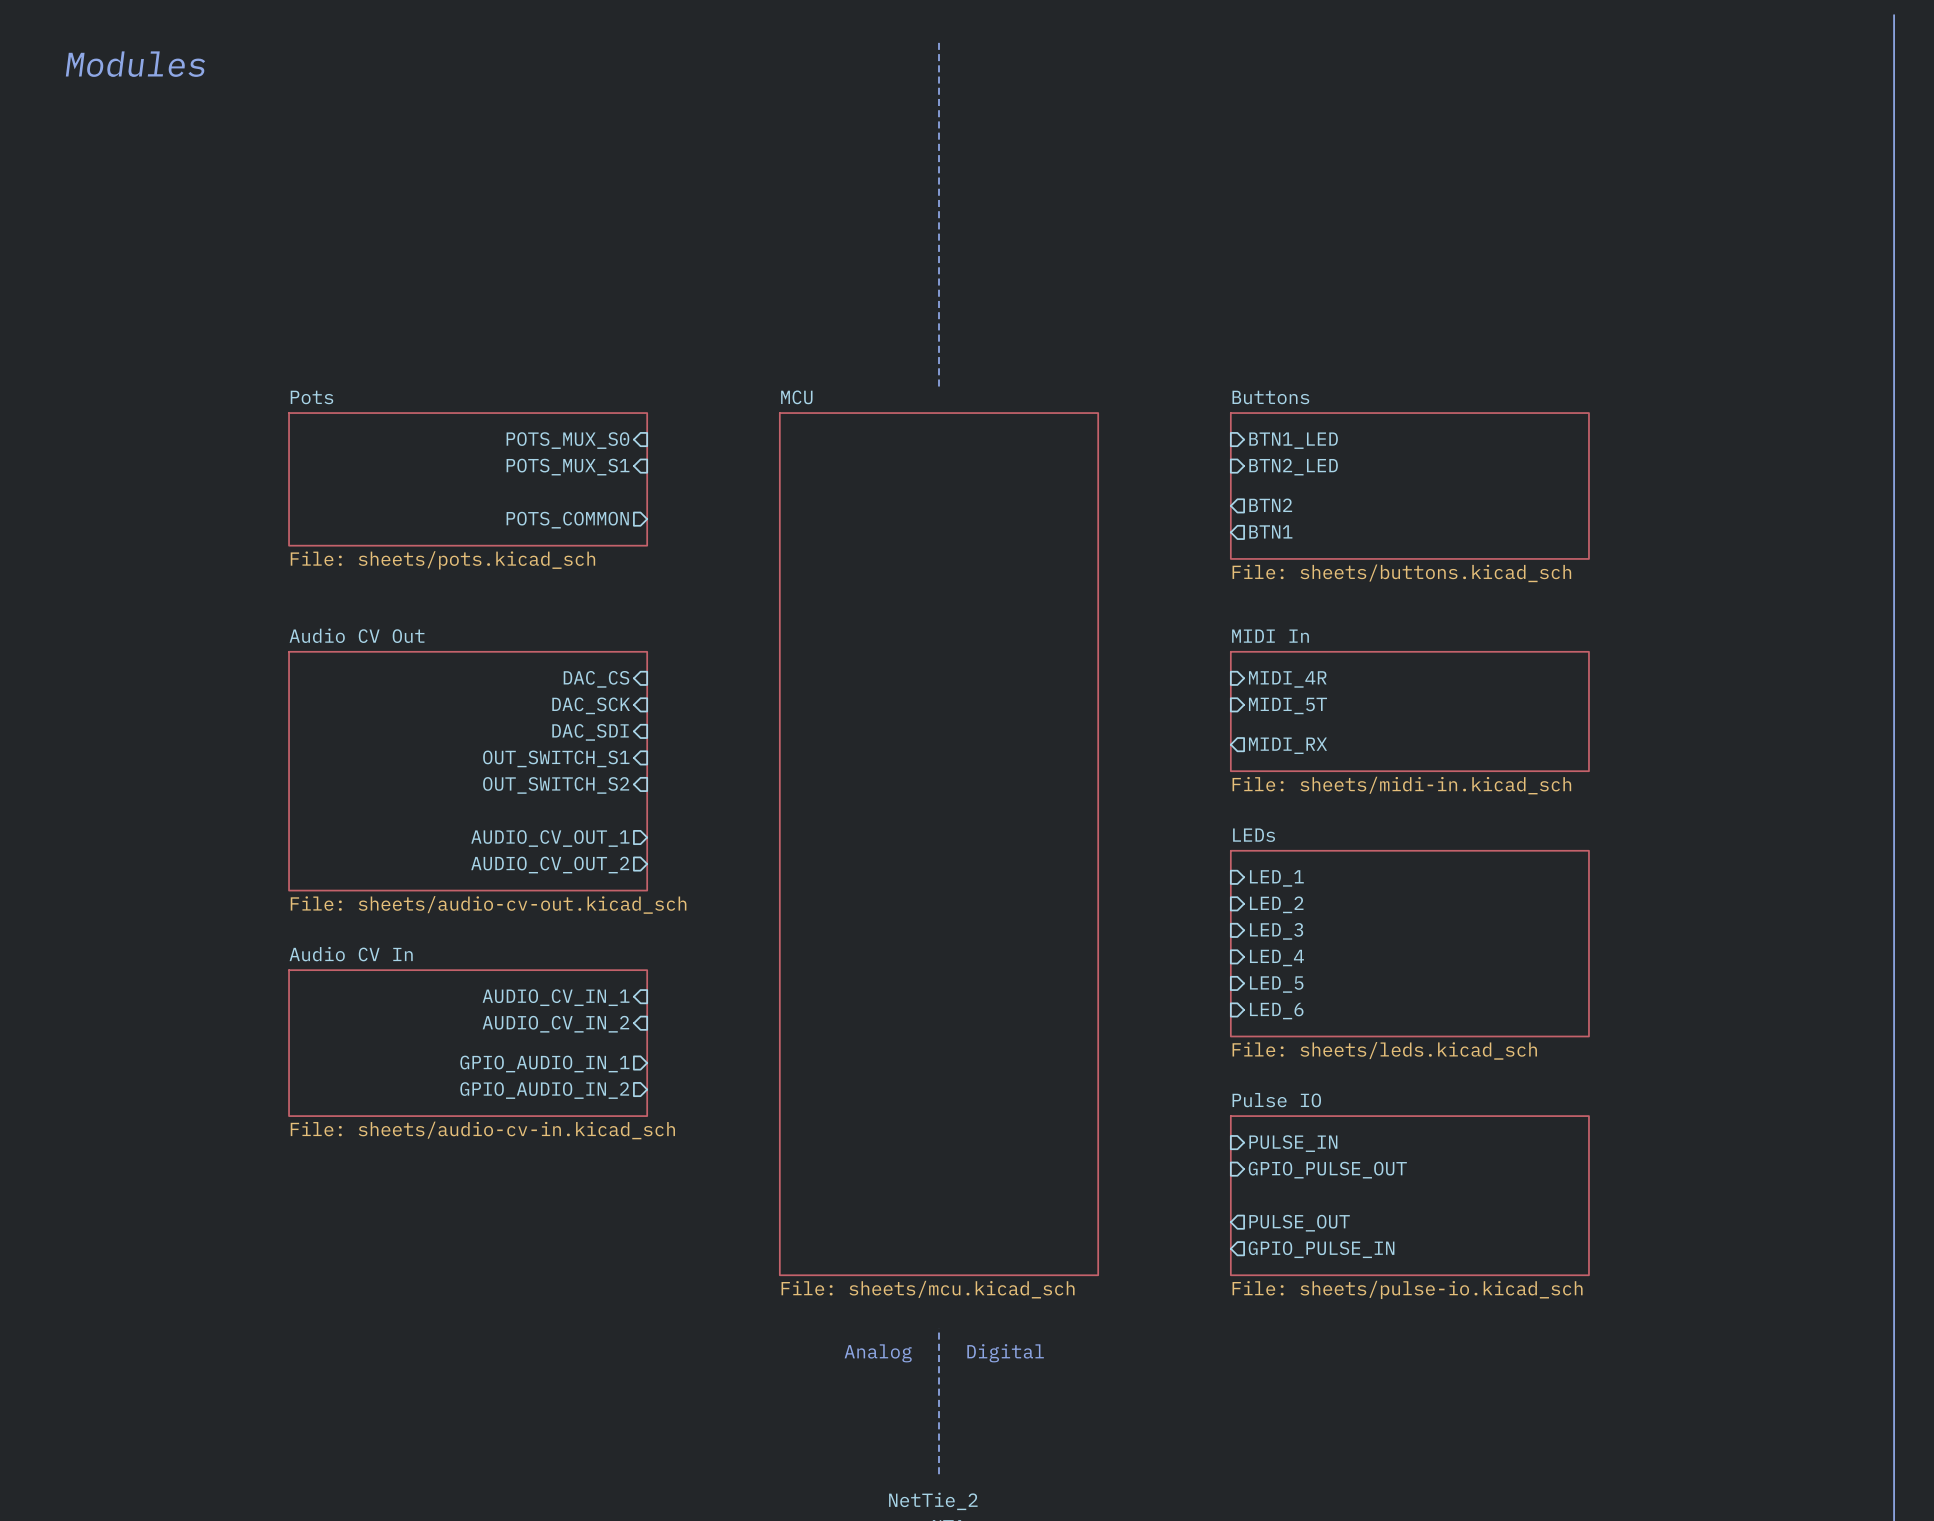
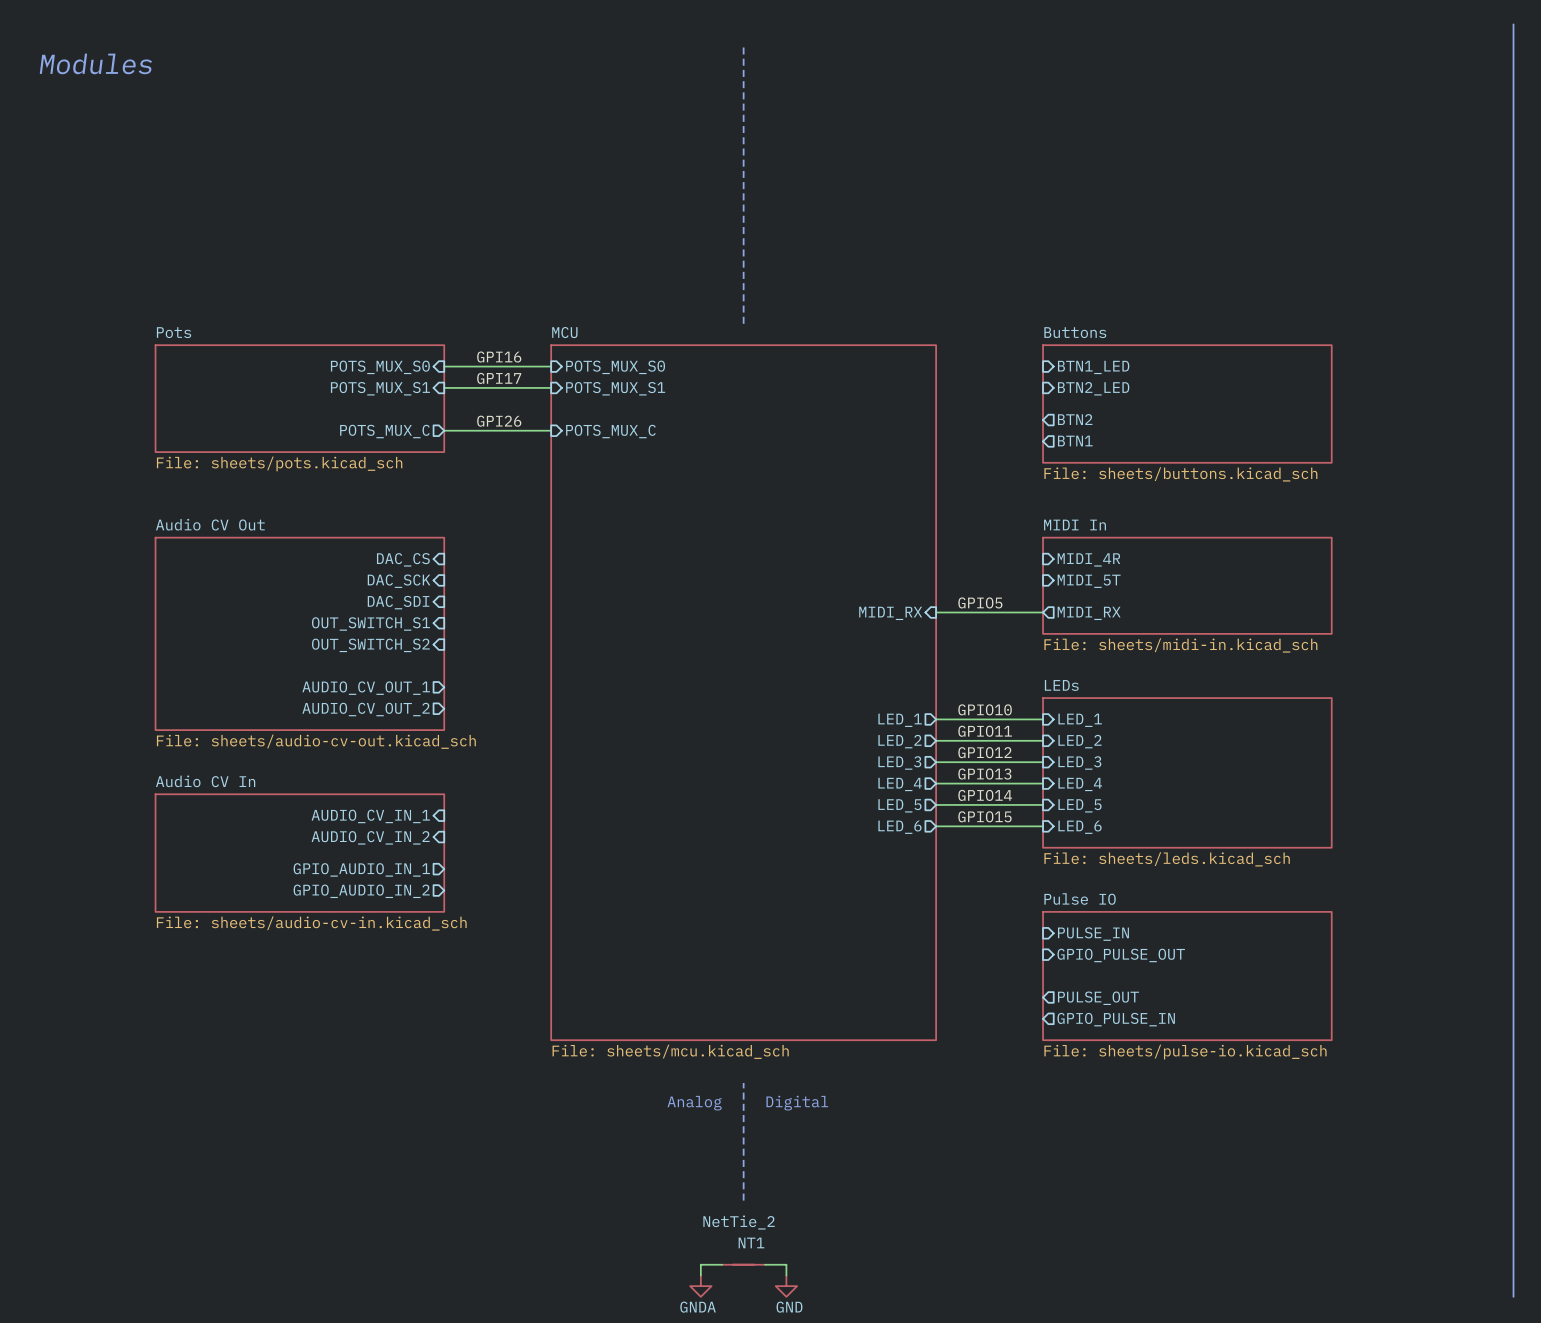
sheet MCU name position: MCU (796, 397) -> MCU (564, 332)
sheet MCU shape: [779, 412, 1099, 1277] -> [550, 344, 937, 1041]
label: none -> GPI16 (499, 357)
wire: none -> (444, 366) (551, 366)
sheet pin: none -> POTS_MUX_S0 (380, 367)
sheet pin: POTS_MUX_S0 (567, 440) -> none
sheet pin: none -> POTS_MUX_S0 (615, 367)
sheet pin position: BTN1_LED (1293, 440) -> BTN1_LED (1093, 367)
label: none -> GPI17 (499, 378)
wire: none -> (444, 387) (551, 387)
sheet pin: none -> POTS_MUX_S1 (380, 388)
sheet pin: POTS_MUX_S1 (568, 467) -> none
sheet pin: none -> POTS_MUX_S1 (615, 388)
sheet pin position: BTN2_LED (1293, 467) -> BTN2_LED (1093, 388)
sheet Pots position: (468, 479) -> (299, 398)
sheet Buttons position: (1409, 485) -> (1187, 403)
sheet pin position: BTN2 (1270, 505) -> BTN2 (1075, 419)
label: none -> GPI26 (499, 421)
wire: none -> (444, 430) (551, 430)
sheet pin: none -> POTS_MUX_C (384, 431)
sheet pin: POTS_COMMON (567, 520) -> none
sheet pin: none -> POTS_MUX_C (610, 431)
sheet pin position: BTN1 (1270, 531) -> BTN1 (1075, 441)
sheet pin position: DAC_CS (596, 679) -> DAC_CS (403, 559)
sheet pin position: MIDI_4R (1287, 679) -> MIDI_4R (1088, 559)
sheet pin position: DAC_SCK (591, 705) -> DAC_SCK (399, 581)
sheet pin position: MIDI_5T (1287, 705) -> MIDI_5T (1089, 581)
sheet MIDI In position: (1409, 711) -> (1187, 585)
sheet pin position: DAC_SDI (590, 732) -> DAC_SDI (398, 602)
label: none -> GPIO5 (980, 602)
wire: none -> (936, 612) (1043, 612)
sheet pin: none -> MIDI_RX (890, 613)
sheet pin position: MIDI_RX (1287, 745) -> MIDI_RX (1089, 613)
sheet pin position: OUT_SWITCH_S1 (556, 758) -> OUT_SWITCH_S1 (370, 623)
sheet Audio CV Out position: (468, 771) -> (299, 633)
sheet pin position: OUT_SWITCH_S2 (556, 785) -> OUT_SWITCH_S2 (370, 645)
sheet pin position: AUDIO_CV_OUT_1 (550, 838) -> AUDIO_CV_OUT_1 (366, 688)
sheet pin position: AUDIO_CV_OUT_2 (550, 865) -> AUDIO_CV_OUT_2 (366, 709)
label: none -> GPIO10 (985, 709)
wire: none -> (936, 719) (1043, 719)
sheet pin: none -> LED_1 (900, 720)
sheet pin: LED_1 (1276, 878) -> none
sheet pin: none -> LED_1 (1080, 720)
label: none -> GPIO11 (985, 731)
wire: none -> (936, 740) (1043, 740)
sheet pin: none -> LED_2 (899, 741)
sheet pin: LED_2 (1276, 904) -> none
sheet pin: none -> LED_2 (1080, 741)
label: none -> GPIO12 (985, 752)
wire: none -> (936, 762) (1043, 762)
sheet pin: none -> LED_3 (899, 763)
sheet pin: LED_3 (1276, 931) -> none
sheet pin: none -> LED_3 (1079, 763)
sheet LEDs position: (1409, 943) -> (1187, 772)
label: none -> GPIO13 (984, 774)
wire: none -> (936, 783) (1043, 783)
sheet pin: none -> LED_4 (900, 784)
sheet pin: LED_4 (1276, 958) -> none
sheet pin: none -> LED_4 (1080, 784)
label: none -> GPIO14 (985, 795)
wire: none -> (936, 804) (1043, 804)
sheet pin: none -> LED_5 (899, 805)
sheet pin: LED_5 (1276, 984) -> none
sheet pin: none -> LED_5 (1079, 805)
sheet pin position: AUDIO_CV_IN_1 (556, 997) -> AUDIO_CV_IN_1 (370, 816)
label: none -> GPIO15 (984, 816)
wire: none -> (936, 826) (1043, 826)
sheet pin: none -> LED_6 (899, 827)
sheet pin: LED_6 (1276, 1011) -> none
sheet pin: none -> LED_6 (1080, 827)
sheet pin position: AUDIO_CV_IN_2 (555, 1024) -> AUDIO_CV_IN_2 (370, 837)
sheet Audio CV In position: (468, 1043) -> (299, 853)
sheet pin position: GPIO_AUDIO_IN_1 (544, 1064) -> GPIO_AUDIO_IN_1 (361, 869)
sheet pin position: GPIO_AUDIO_IN_2 (544, 1090) -> GPIO_AUDIO_IN_2 (361, 891)
sheet pin position: PULSE_IN (1293, 1143) -> PULSE_IN (1093, 934)
sheet pin position: GPIO_PULSE_OUT (1327, 1170) -> GPIO_PULSE_OUT (1121, 955)
sheet Pulse IO position: (1409, 1195) -> (1187, 976)
sheet pin position: PULSE_OUT (1299, 1223) -> PULSE_OUT (1098, 998)
sheet pin position: GPIO_PULSE_IN (1321, 1249) -> GPIO_PULSE_IN (1116, 1019)
sheet MCU value position: File: sheets/mcu.kicad_sch (928, 1289) -> File: sheets/mcu.kicad_sch (670, 1051)

